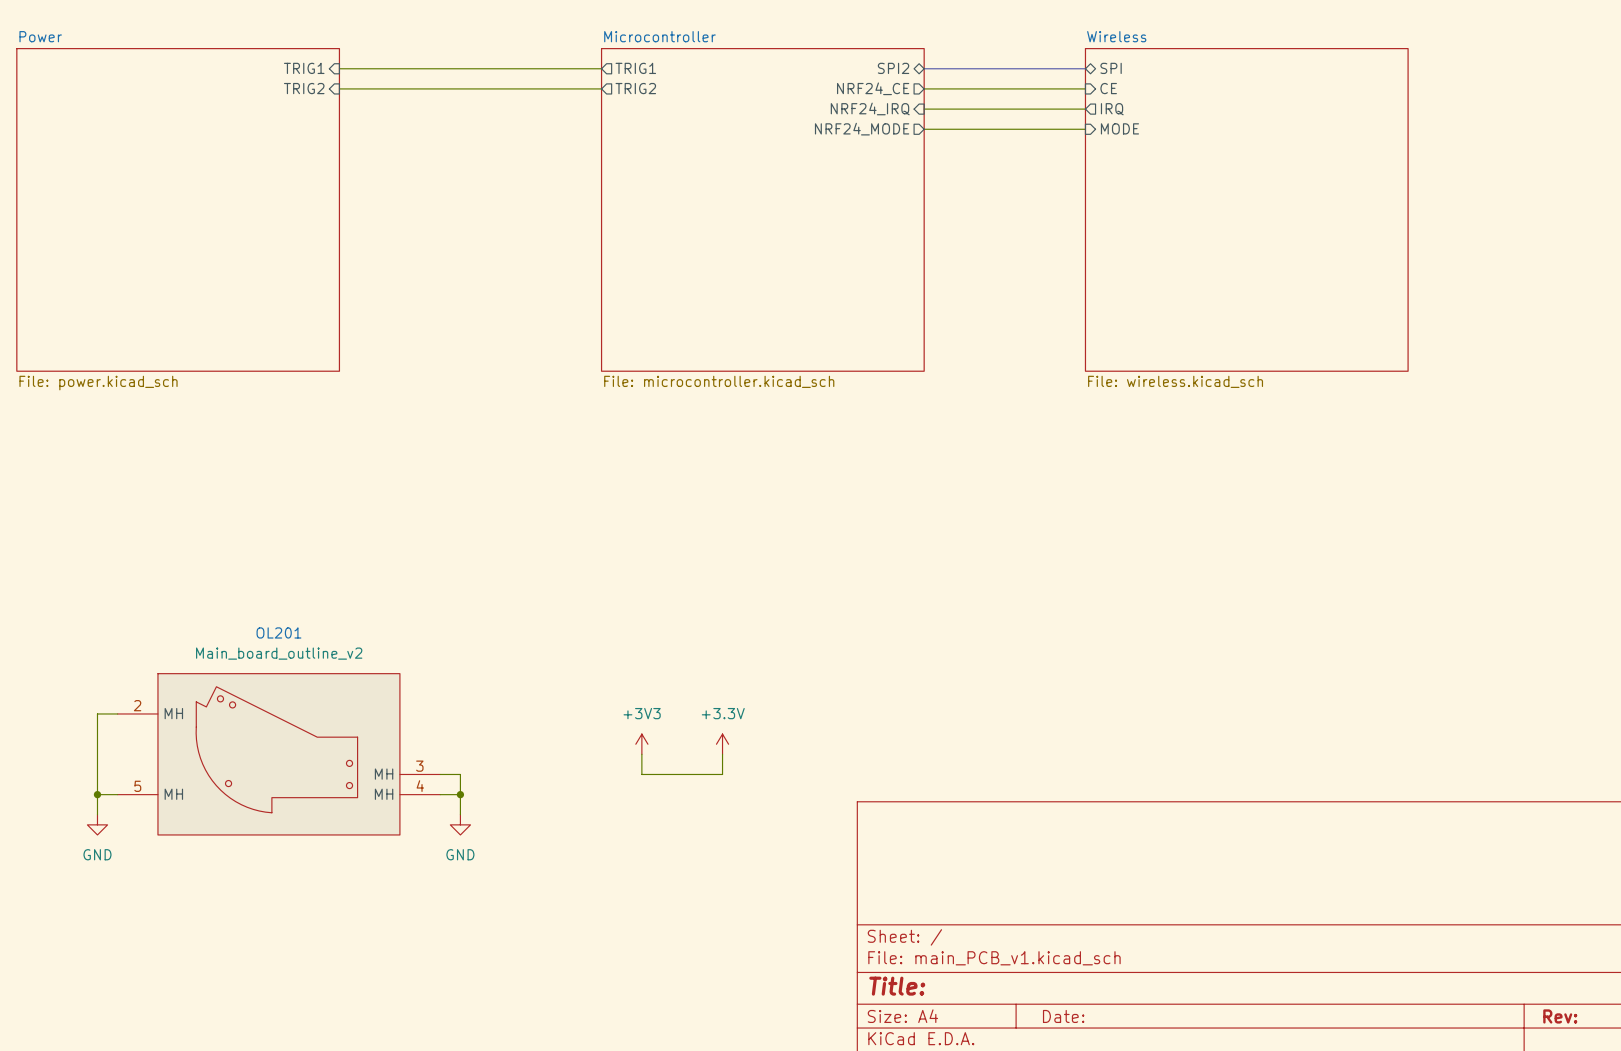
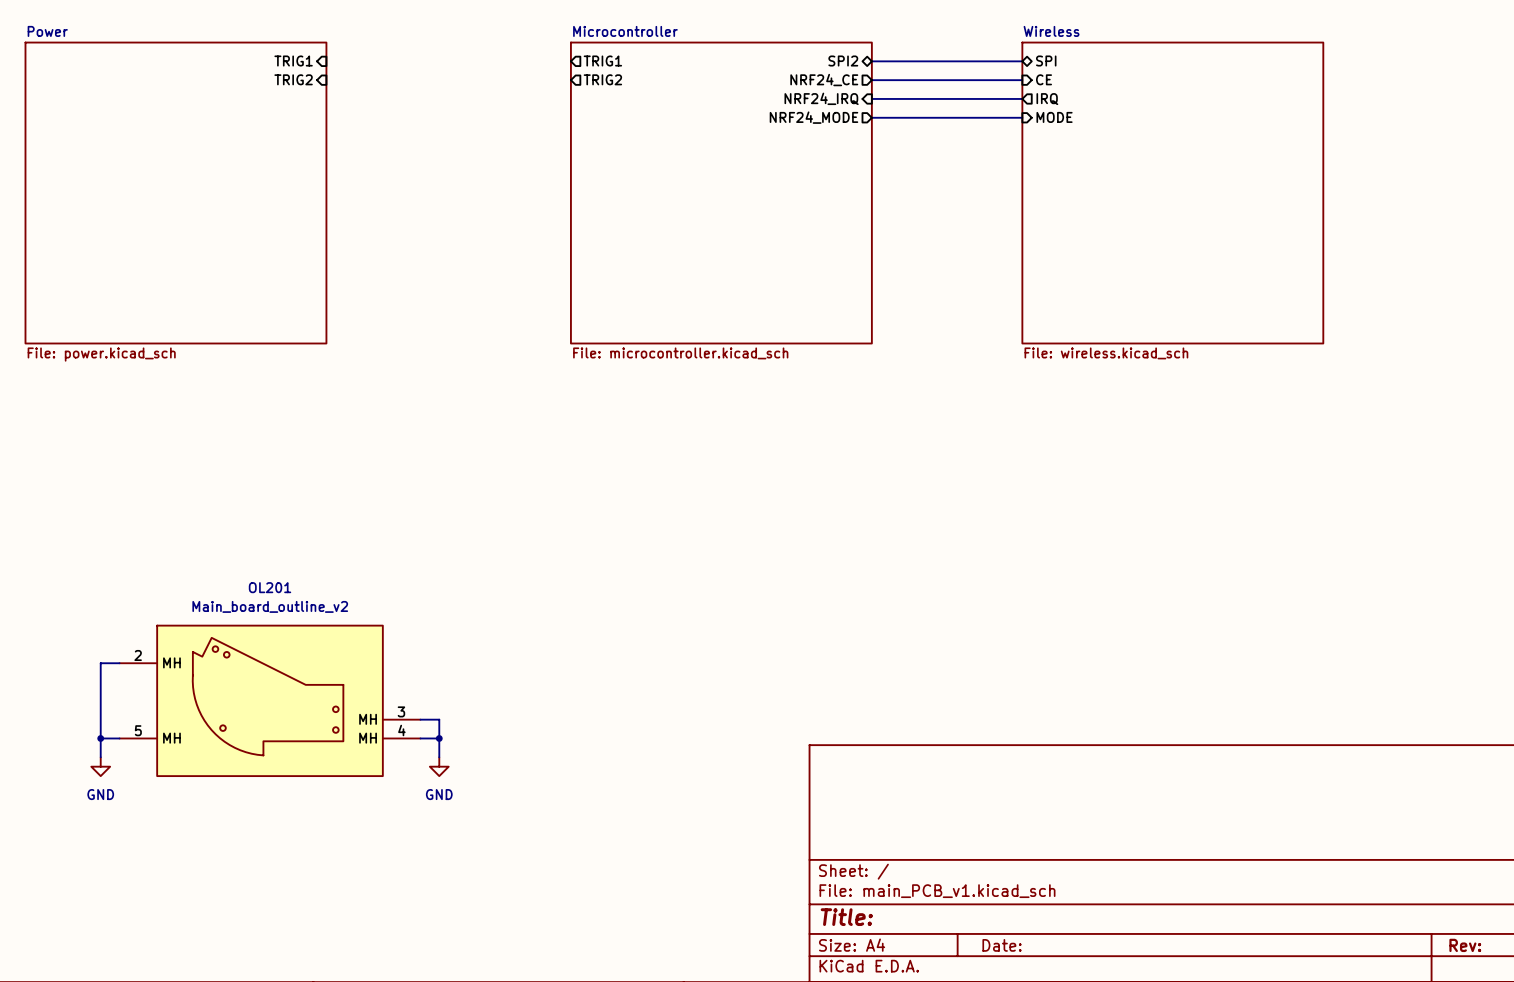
wire: (339, 68) (601, 68) -> none
wire: (339, 88) (601, 88) -> none
power symbol: +3V3 (641, 744) -> none
power symbol: +3.3V (722, 744) -> none
wire: (641, 754) (641, 774) (722, 774) (722, 754) -> none

